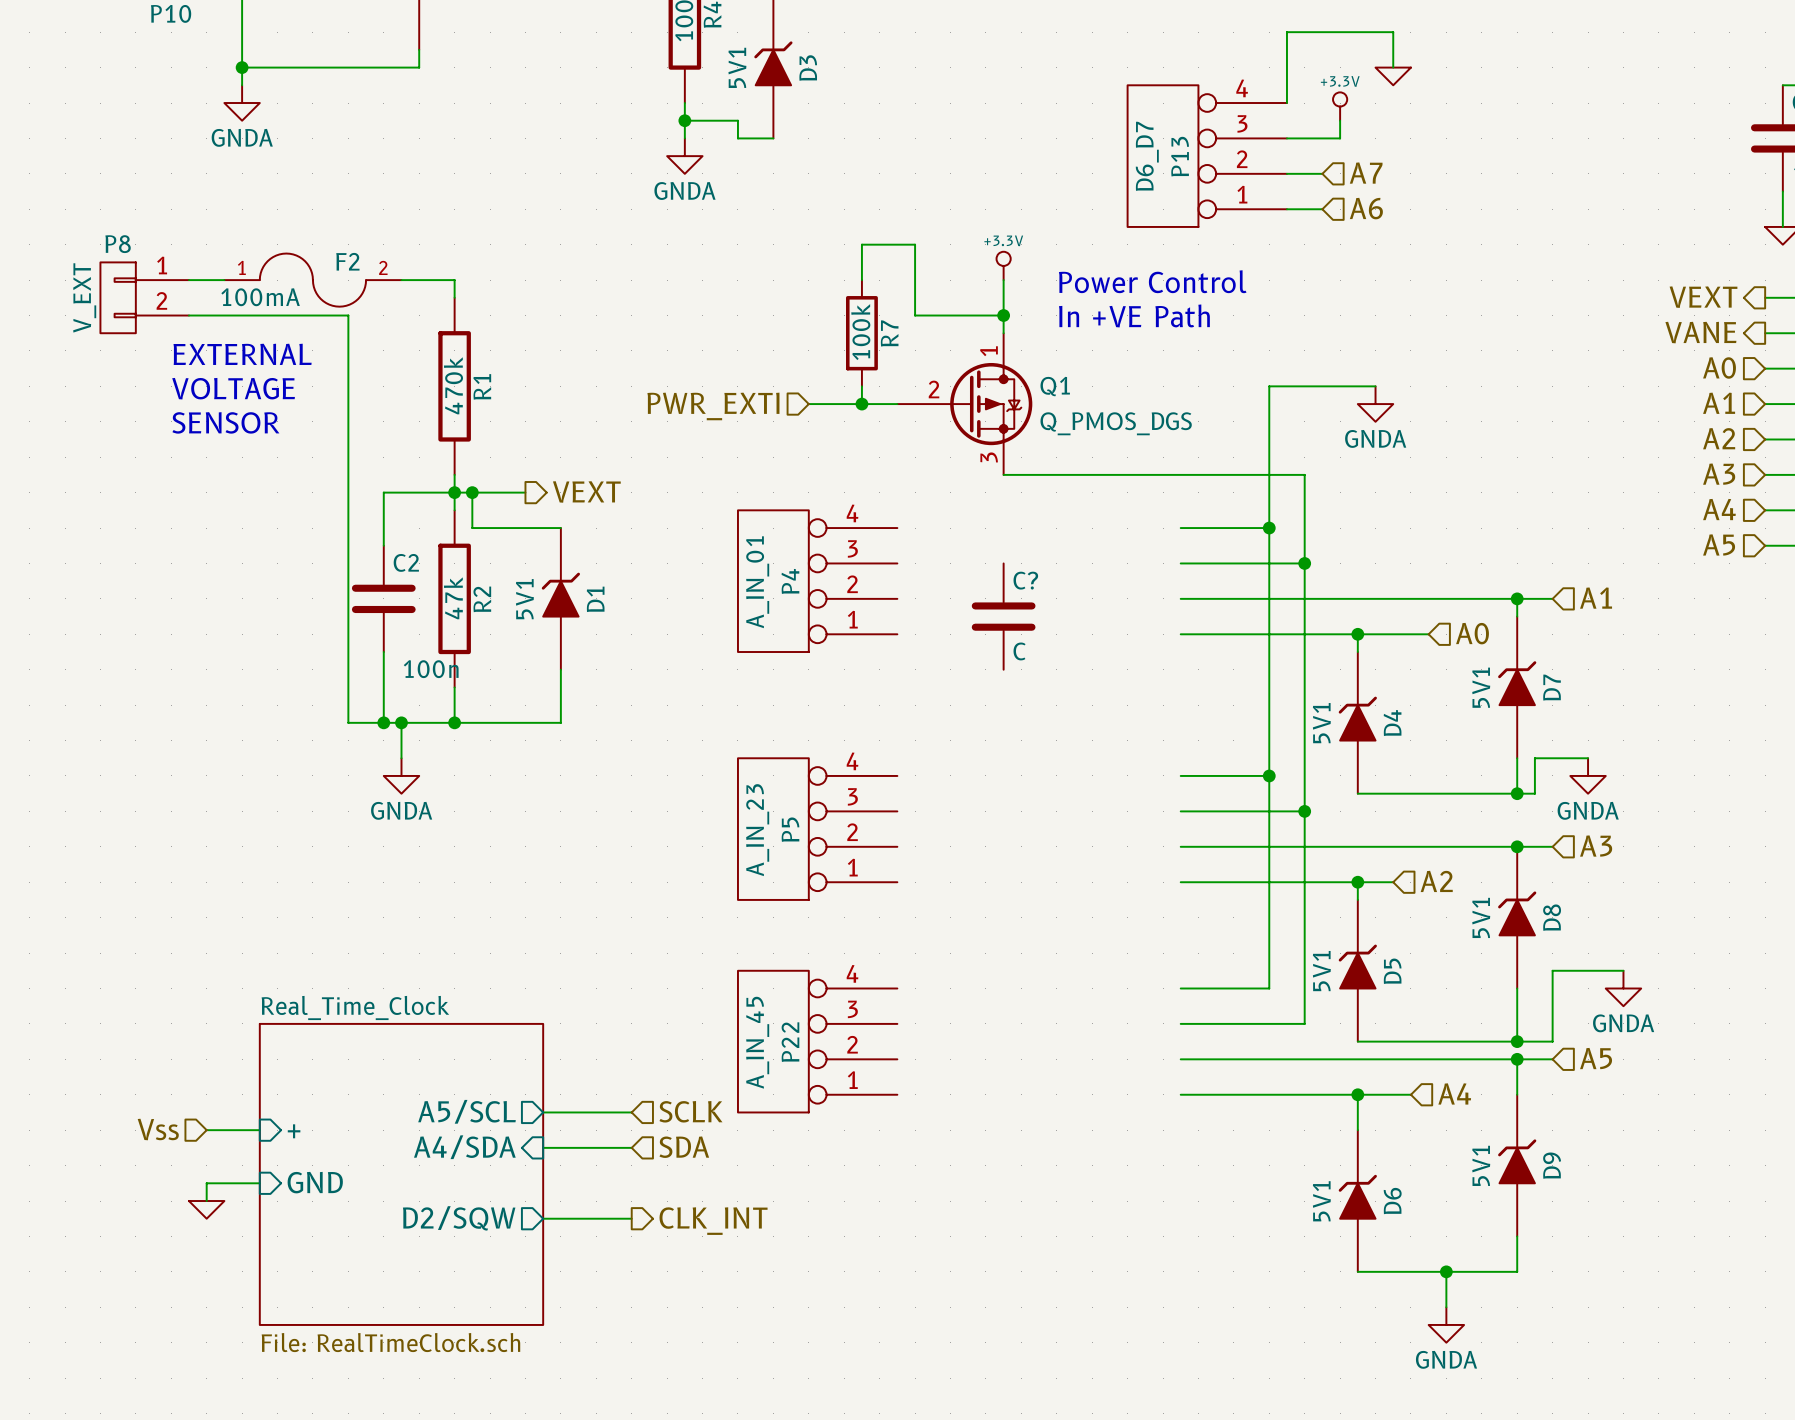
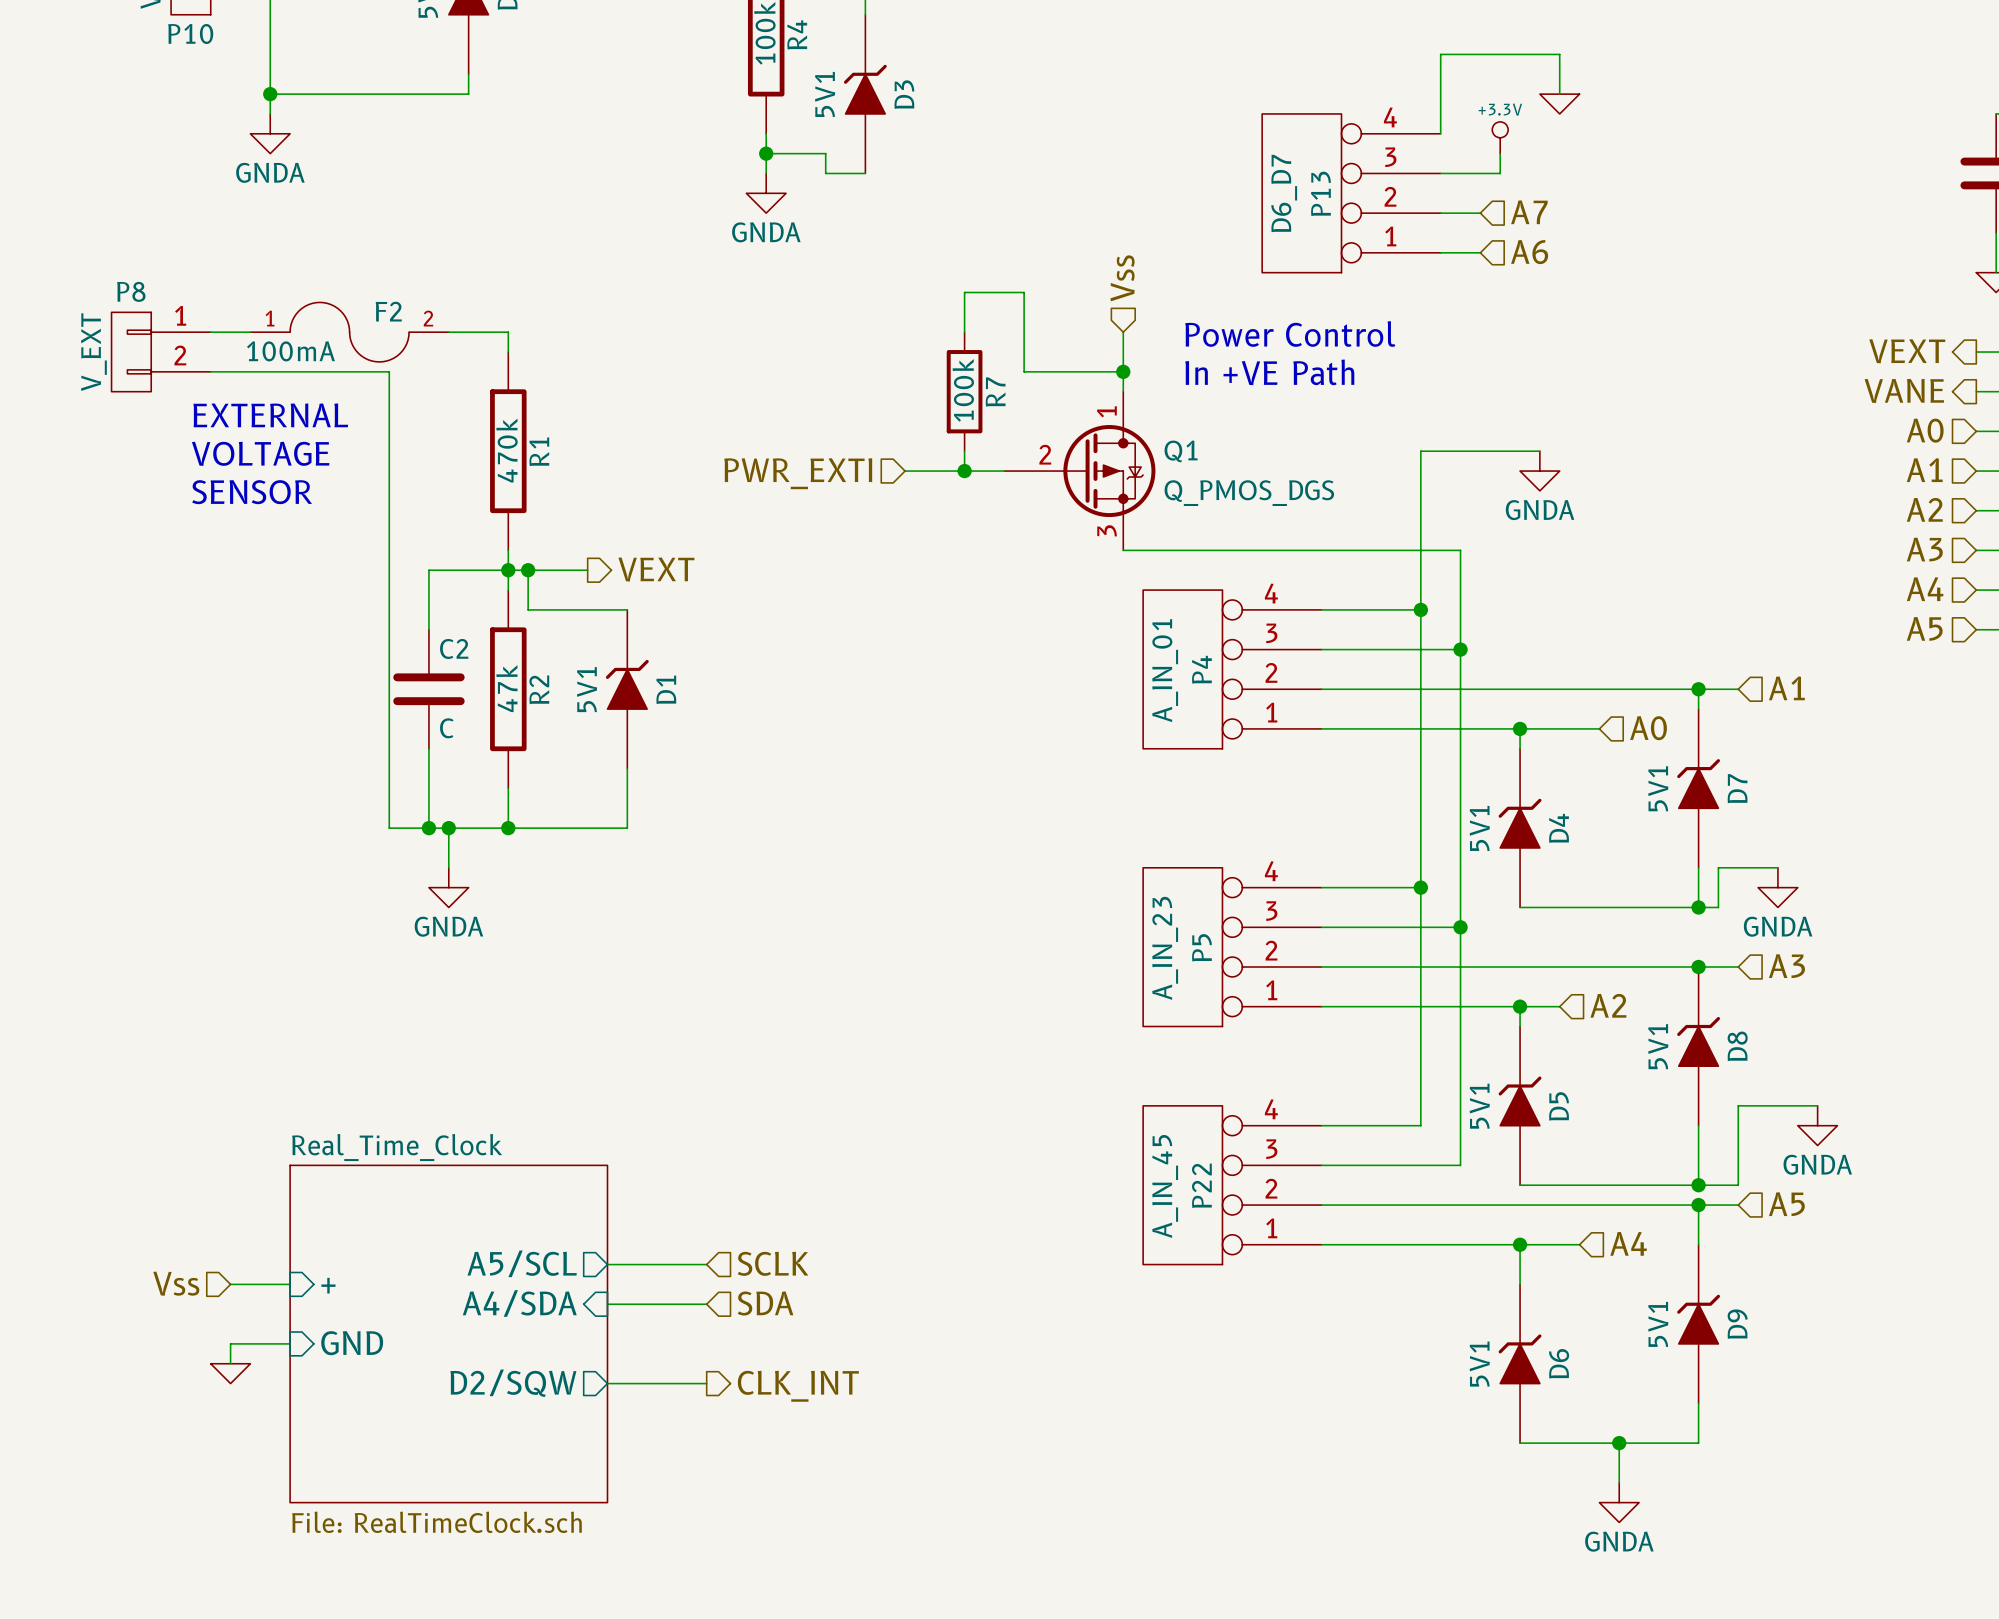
hierarchical label: none -> Vss (1122, 278)
power symbol: +3.3V (1003, 265) -> none
P4 position: (817, 581) -> (1232, 669)
C?: C (1003, 616) -> none
C2 value: 100n (431, 669) -> C (446, 728)
P5 position: (817, 829) -> (1232, 947)
P22 position: (817, 1041) -> (1232, 1185)

